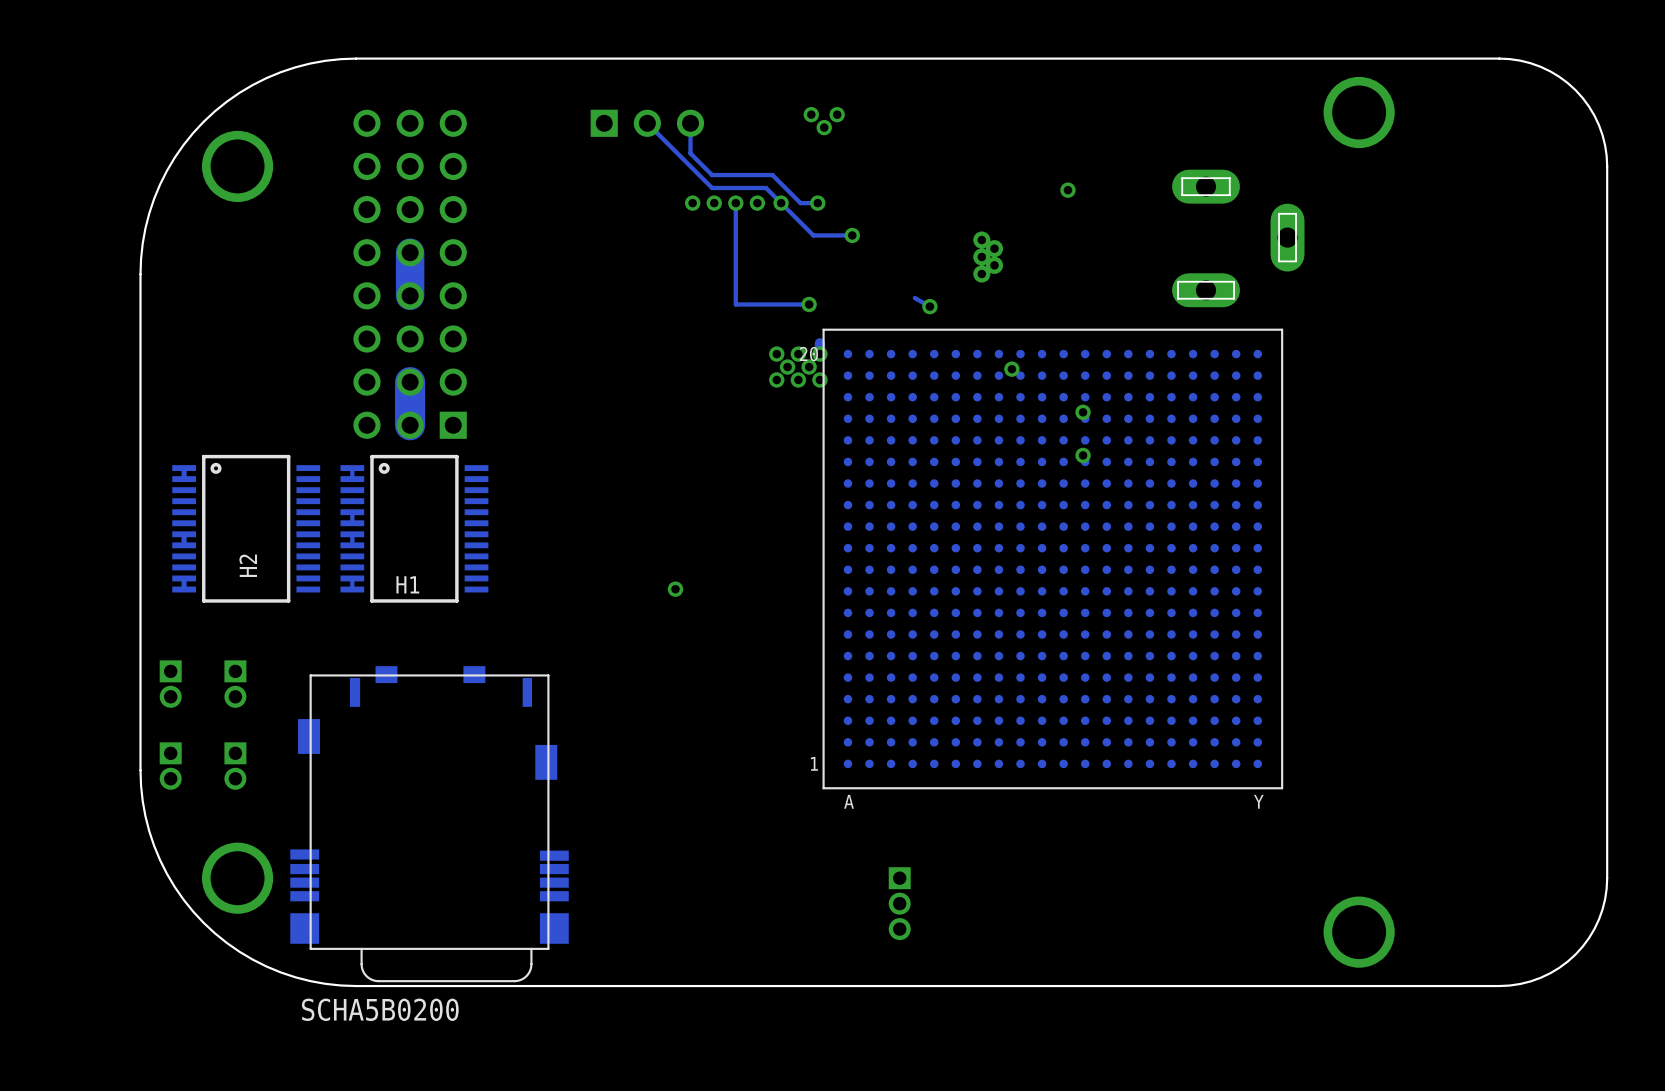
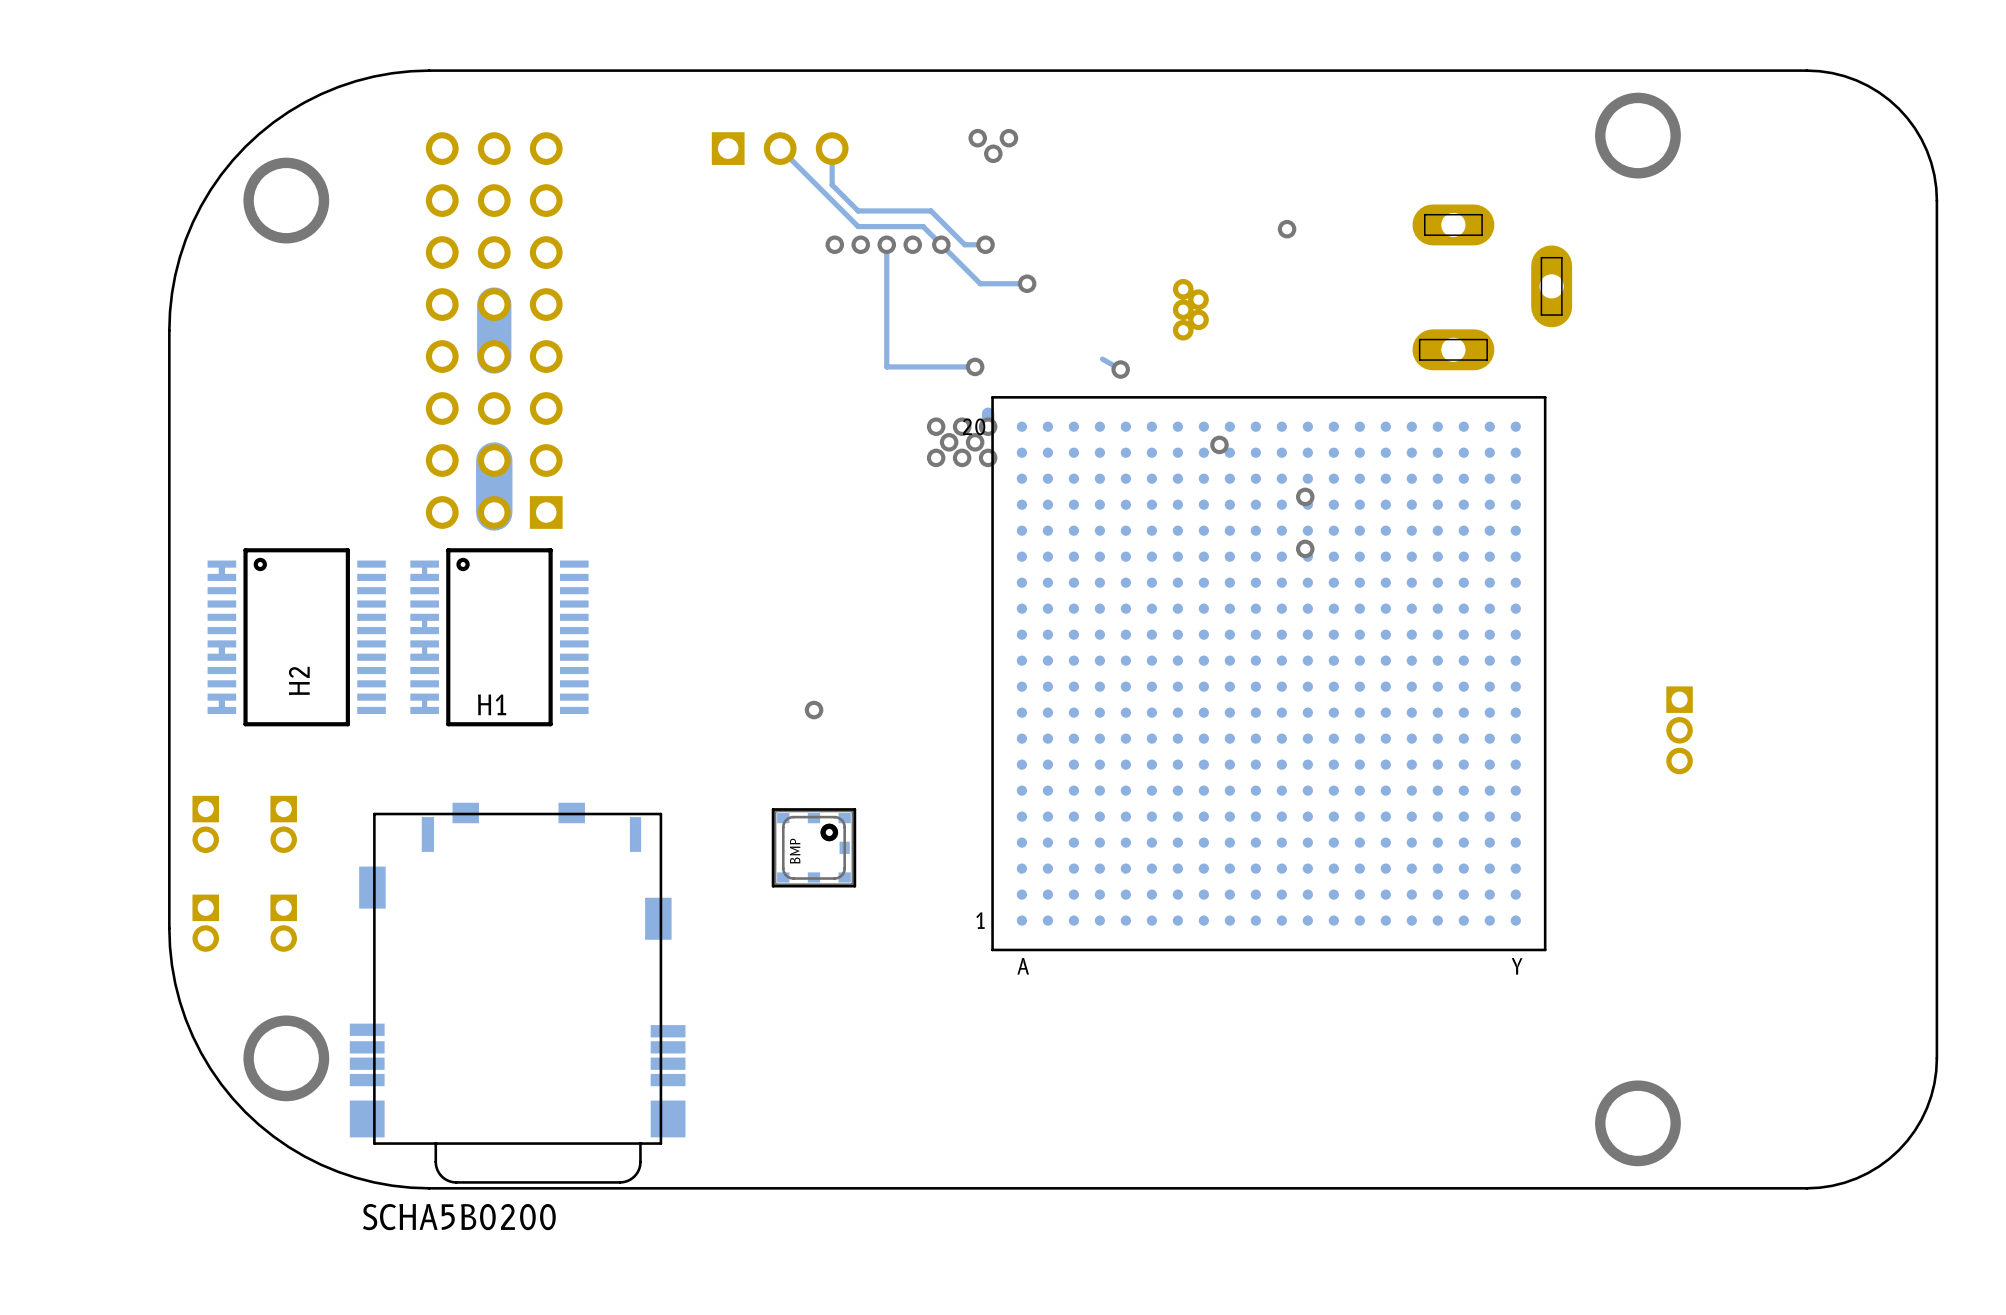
part: none -> (1679, 730)
BMP: none -> (813, 847)
part: (899, 903) -> none

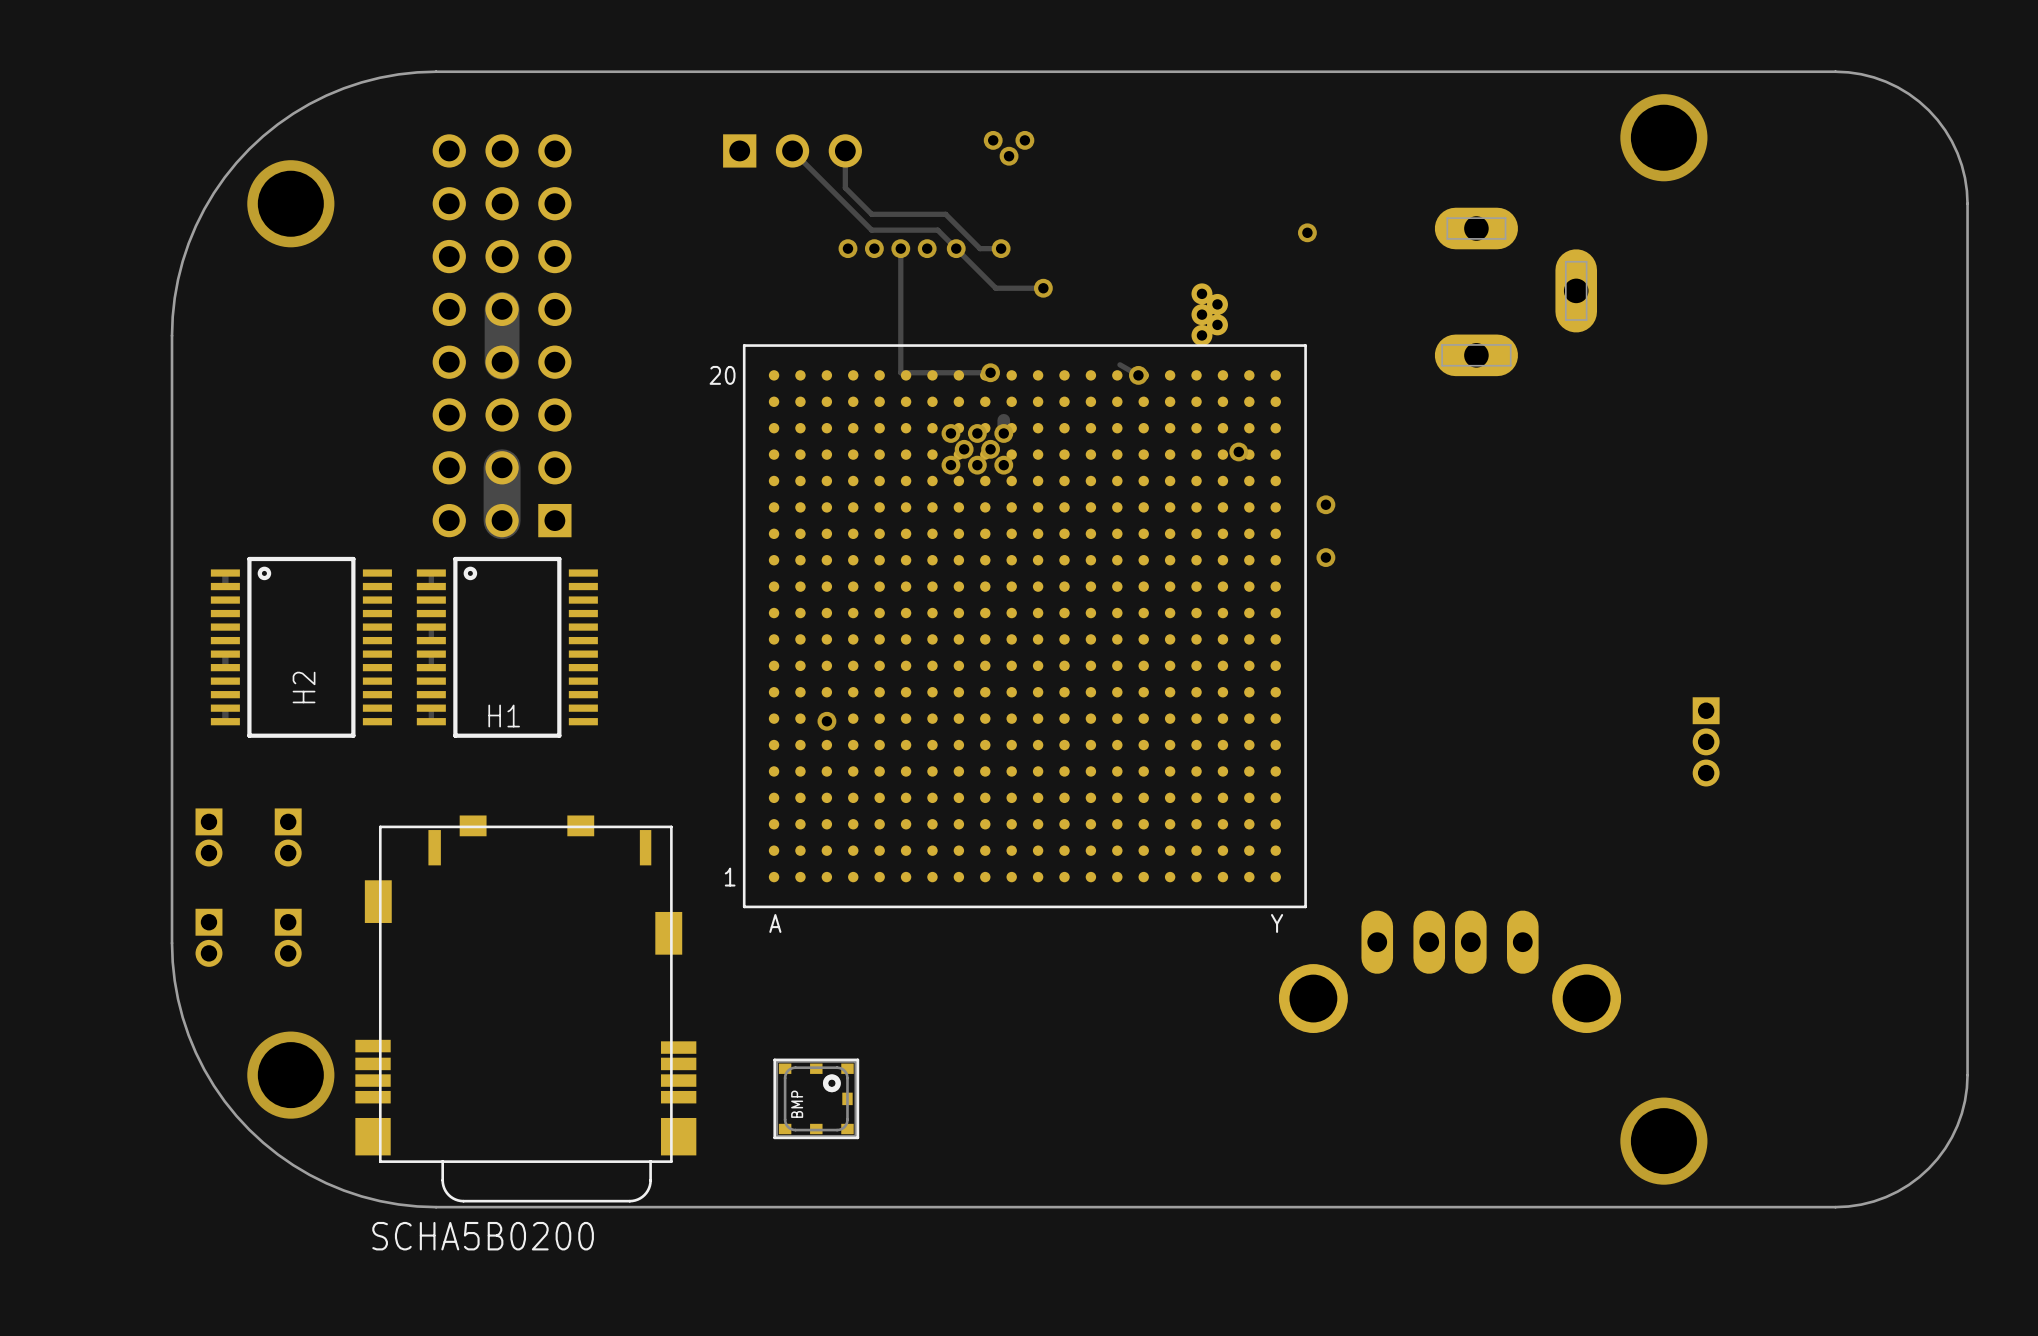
part position: (1268, 673) -> (1024, 626)
BMP position: (813, 847) -> (816, 1098)
part: none -> (1450, 971)

